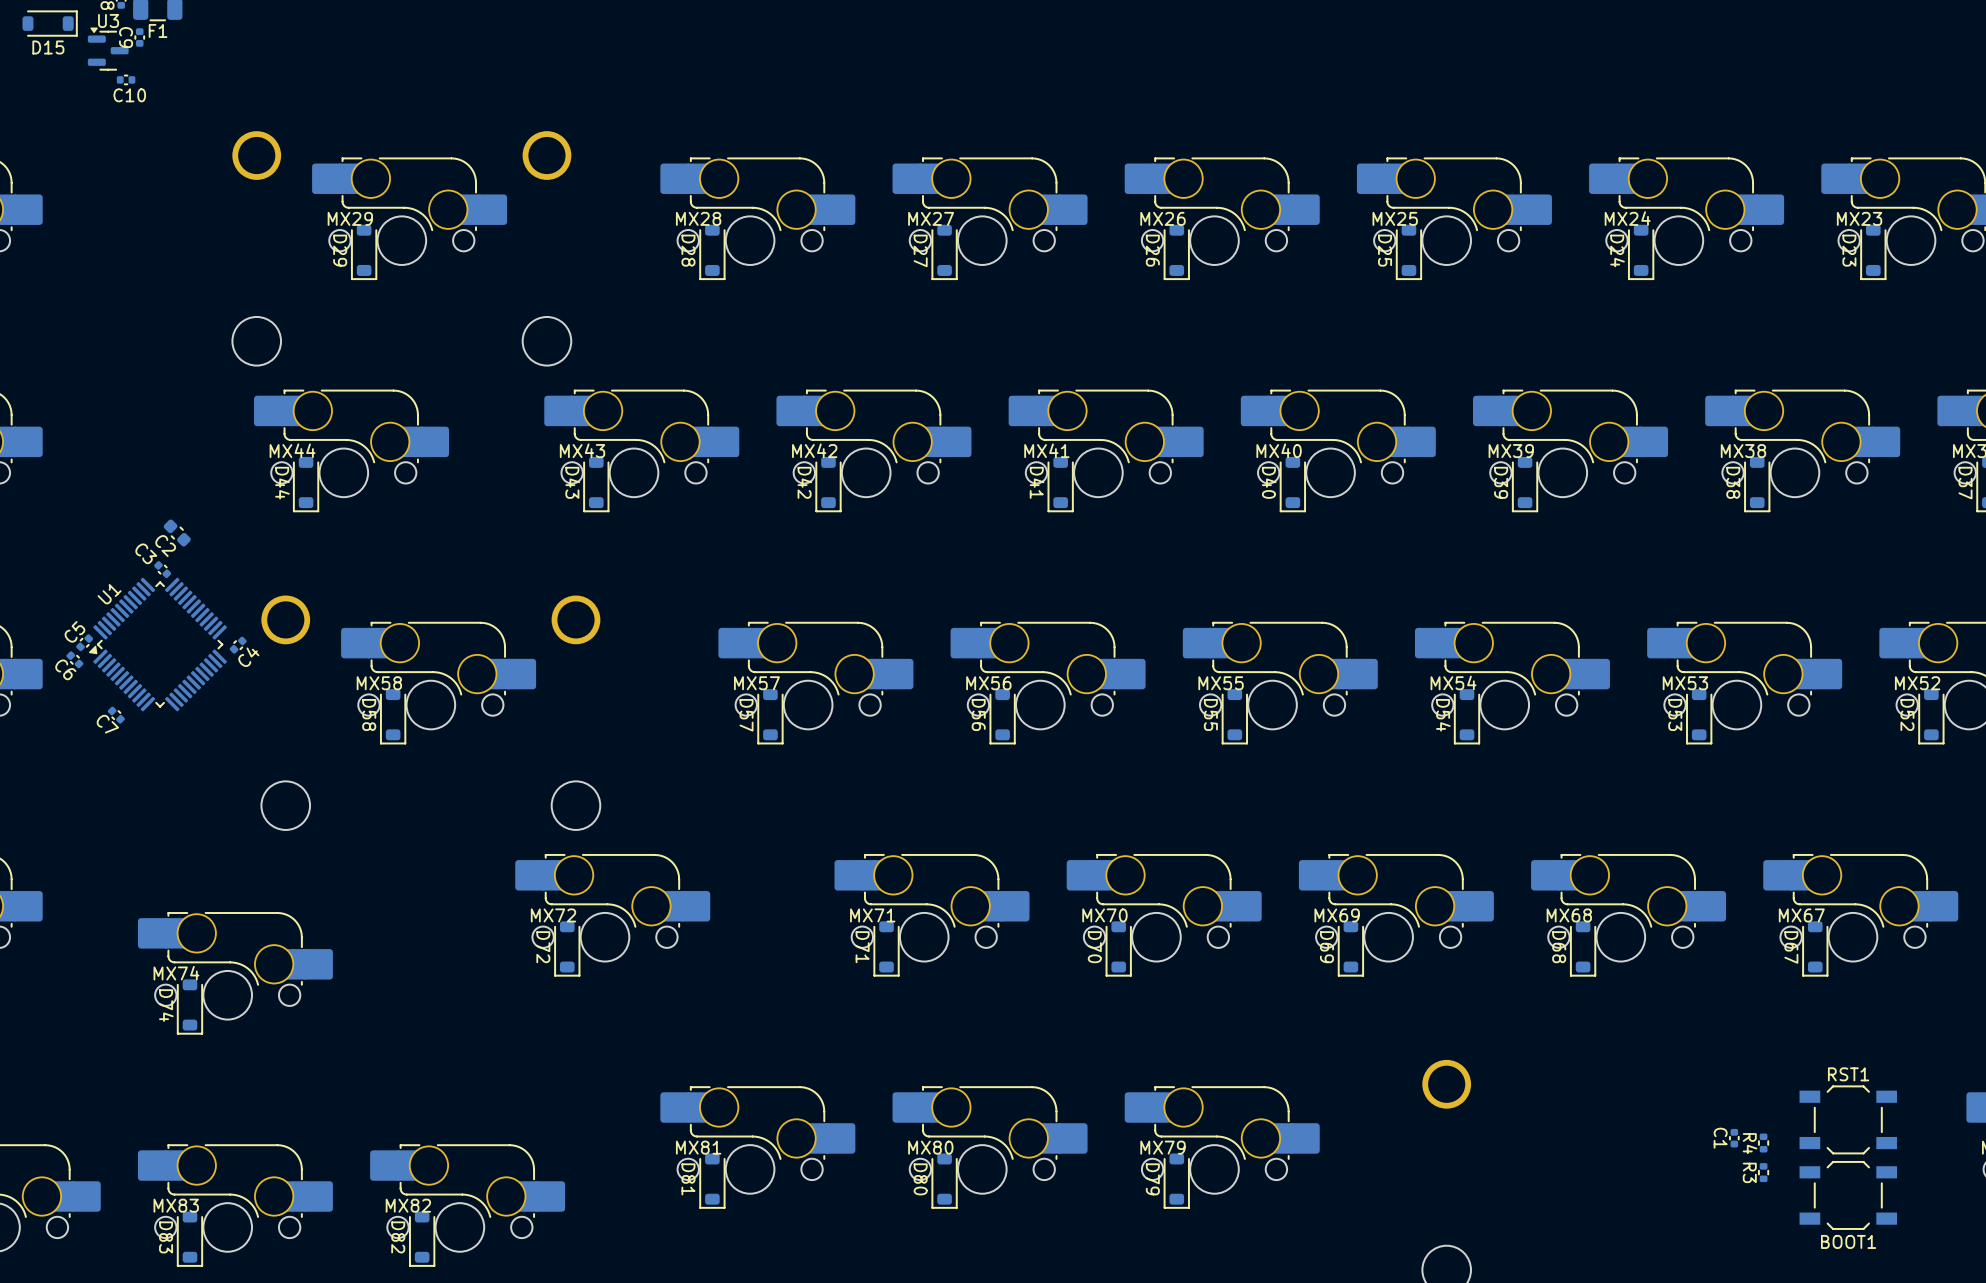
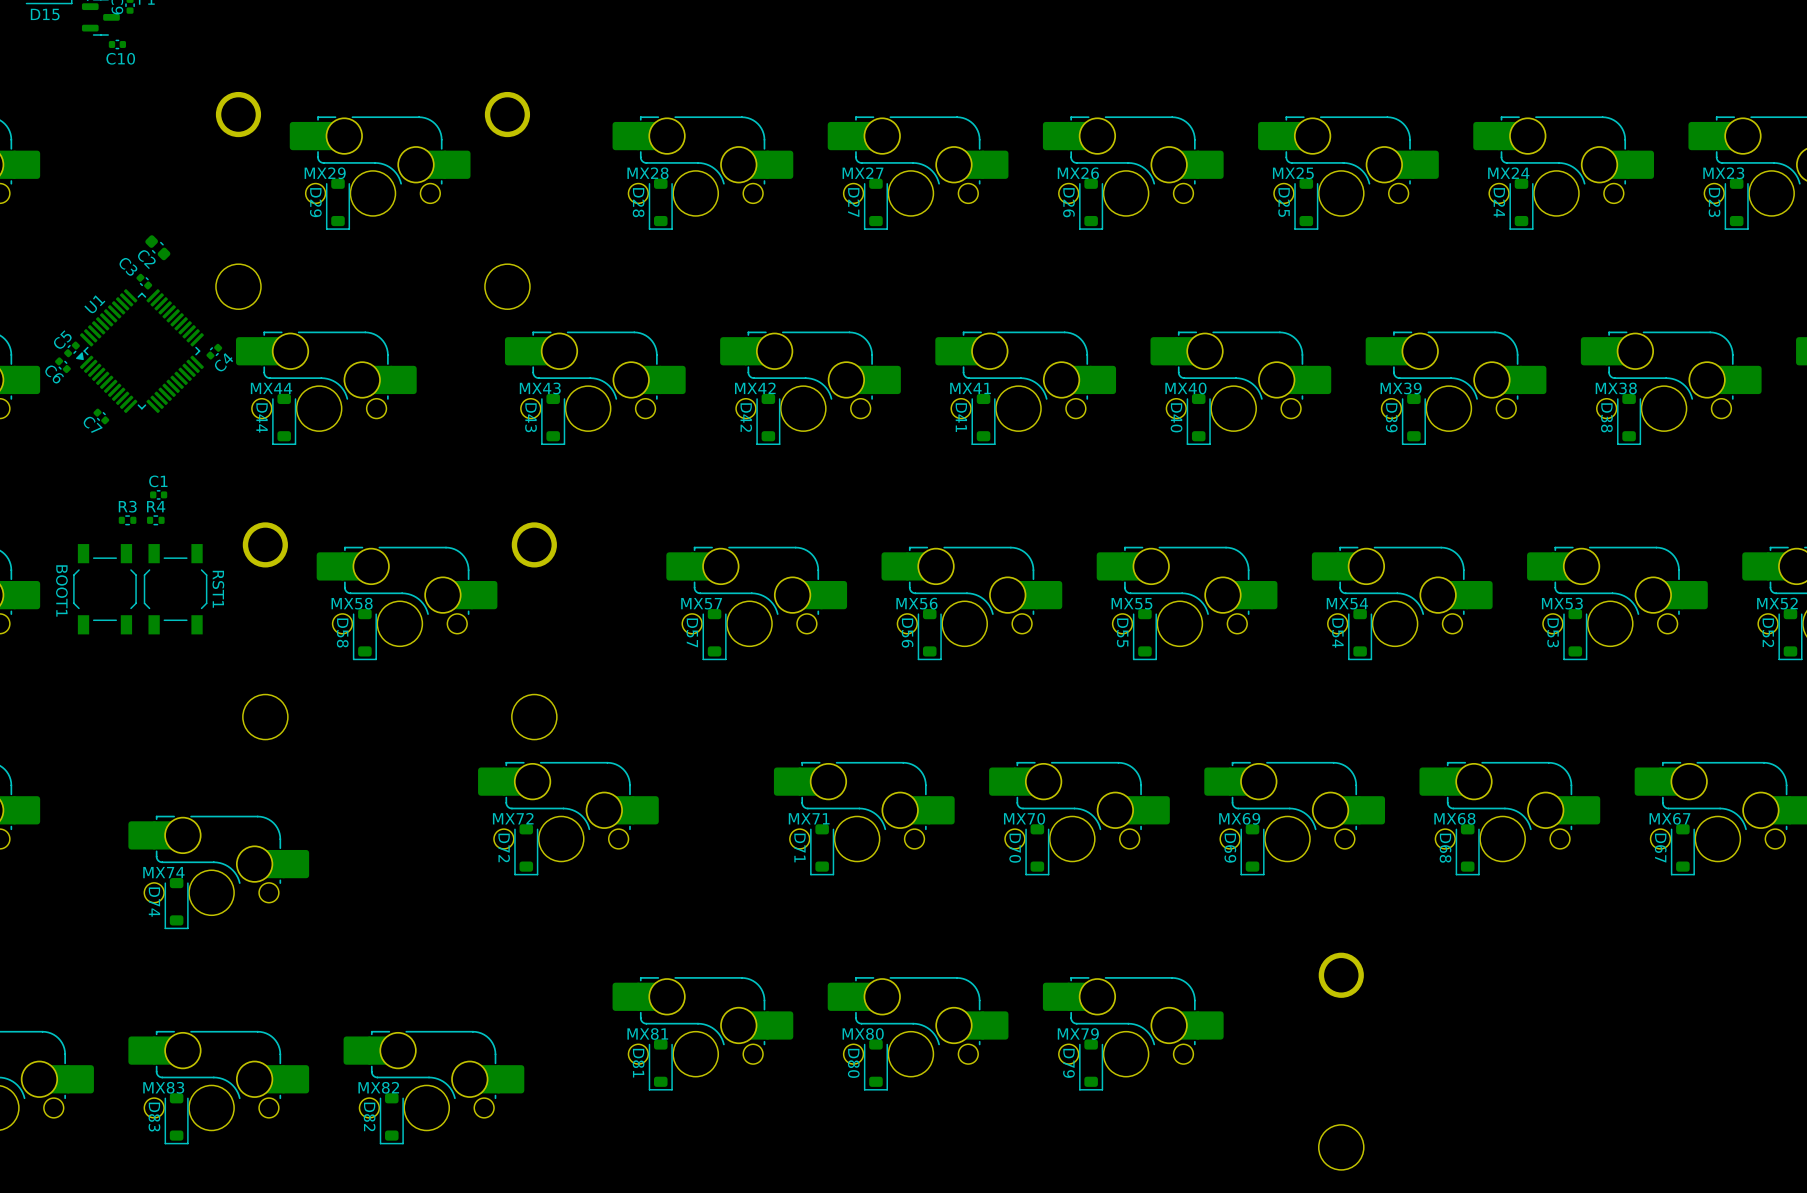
C2 position: (177, 533) -> (157, 247)
C3 position: (162, 569) -> (144, 281)
C5 position: (84, 642) -> (71, 349)
U1 position: (157, 644) -> (139, 351)
C4 position: (238, 645) -> (214, 351)
C6 position: (74, 659) -> (62, 365)
C7 position: (116, 715) -> (101, 416)
RST1 rotation: 0° (1848, 1119) -> 90° clockwise (175, 589)
RST1 position: (1848, 1119) -> (175, 589)
C1 rotation: 0° (1734, 1138) -> 90° clockwise (158, 494)
C1 position: (1734, 1138) -> (158, 494)
R4 rotation: 0° (1763, 1143) -> 90° clockwise (155, 520)
R4 position: (1763, 1143) -> (155, 520)
R3 rotation: 0° (1763, 1172) -> 90° clockwise (127, 520)
R3 position: (1763, 1172) -> (127, 520)
BOOT1 rotation: 0° (1848, 1195) -> 90° clockwise (104, 589)
BOOT1 position: (1848, 1195) -> (104, 589)

